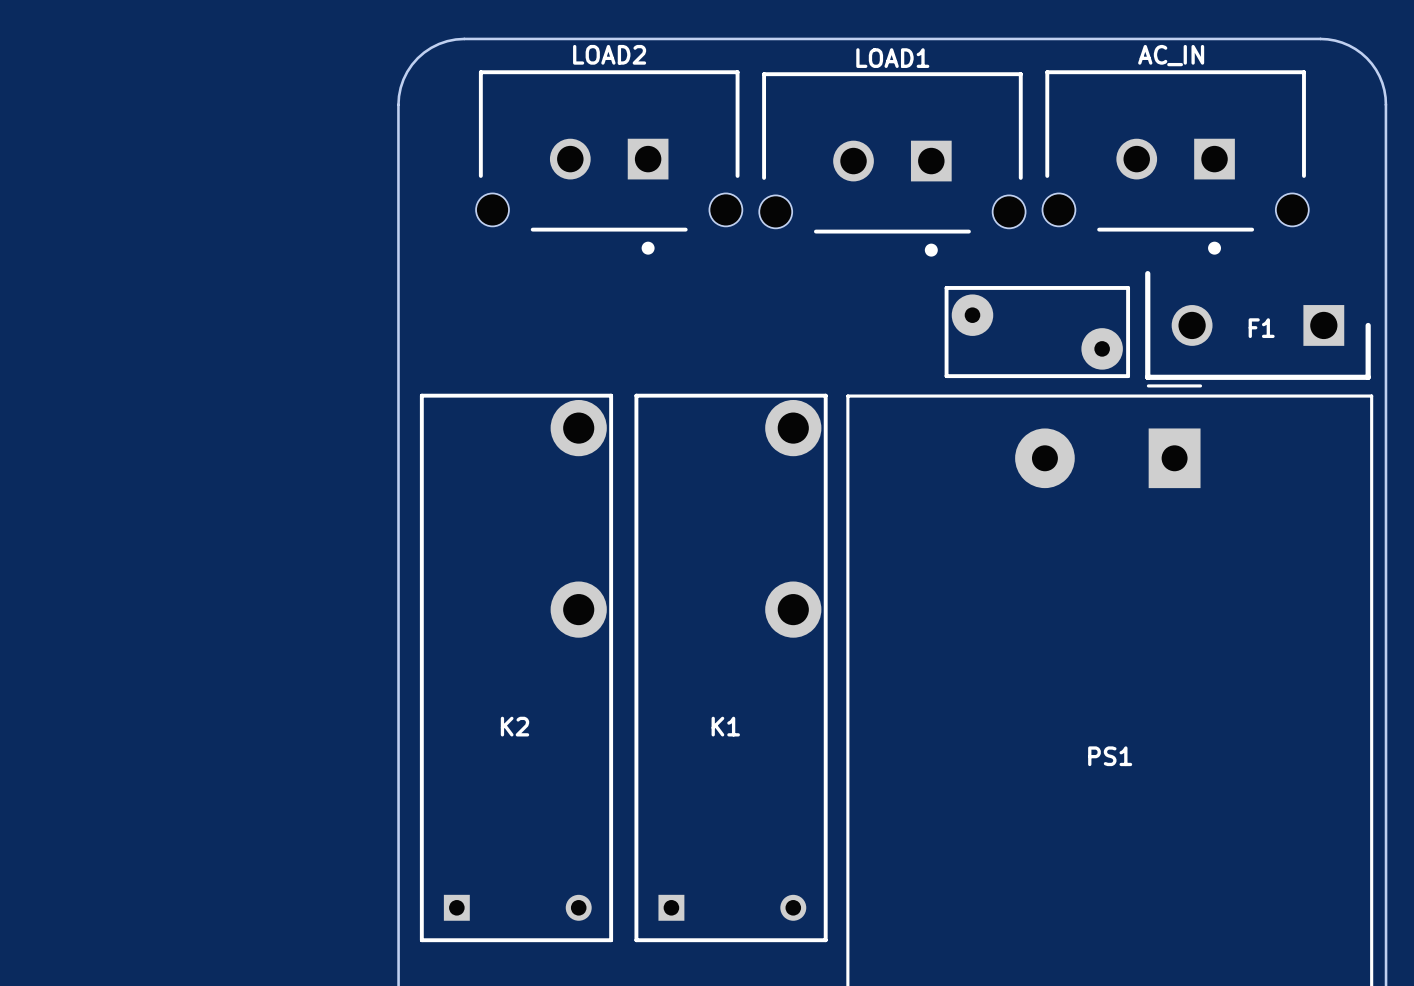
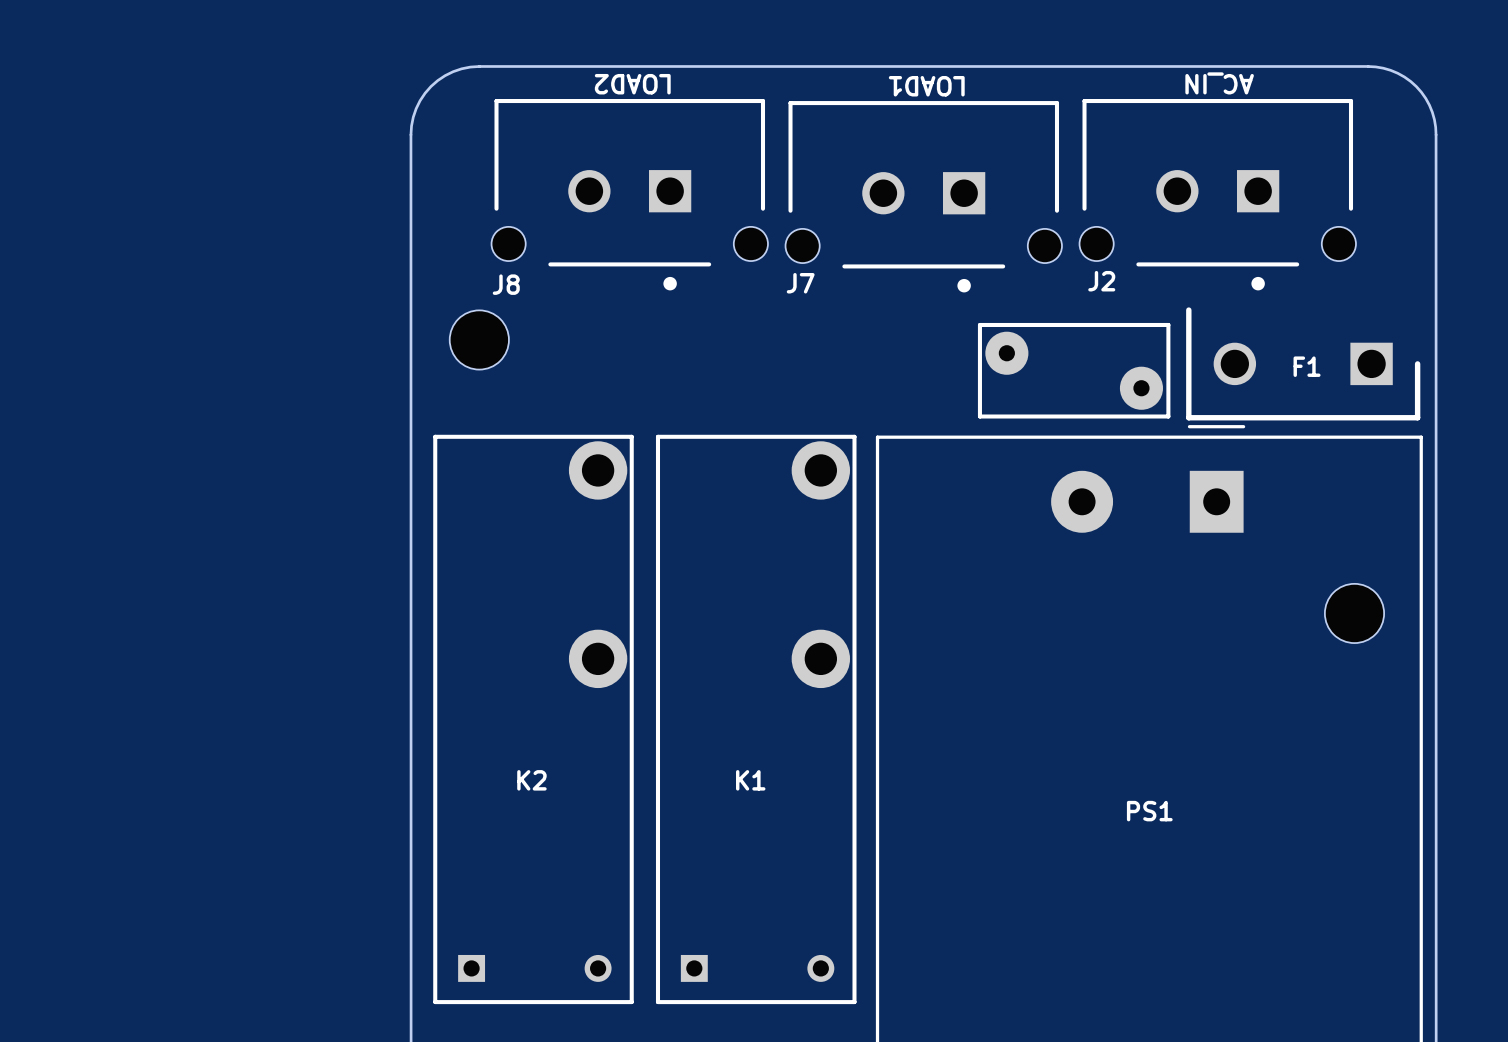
J8 value rotation: 0° (609, 54) -> 180° (632, 84)
J2 value rotation: 0° (1171, 55) -> 180° (1219, 83)
J7 value rotation: 0° (892, 58) -> 180° (926, 86)
J2 name: none -> J2 (1101, 281)
J7 name: none -> J7 (800, 283)
J8 name: none -> J8 (506, 284)
part: none -> (479, 339)
part: none -> (1354, 613)

